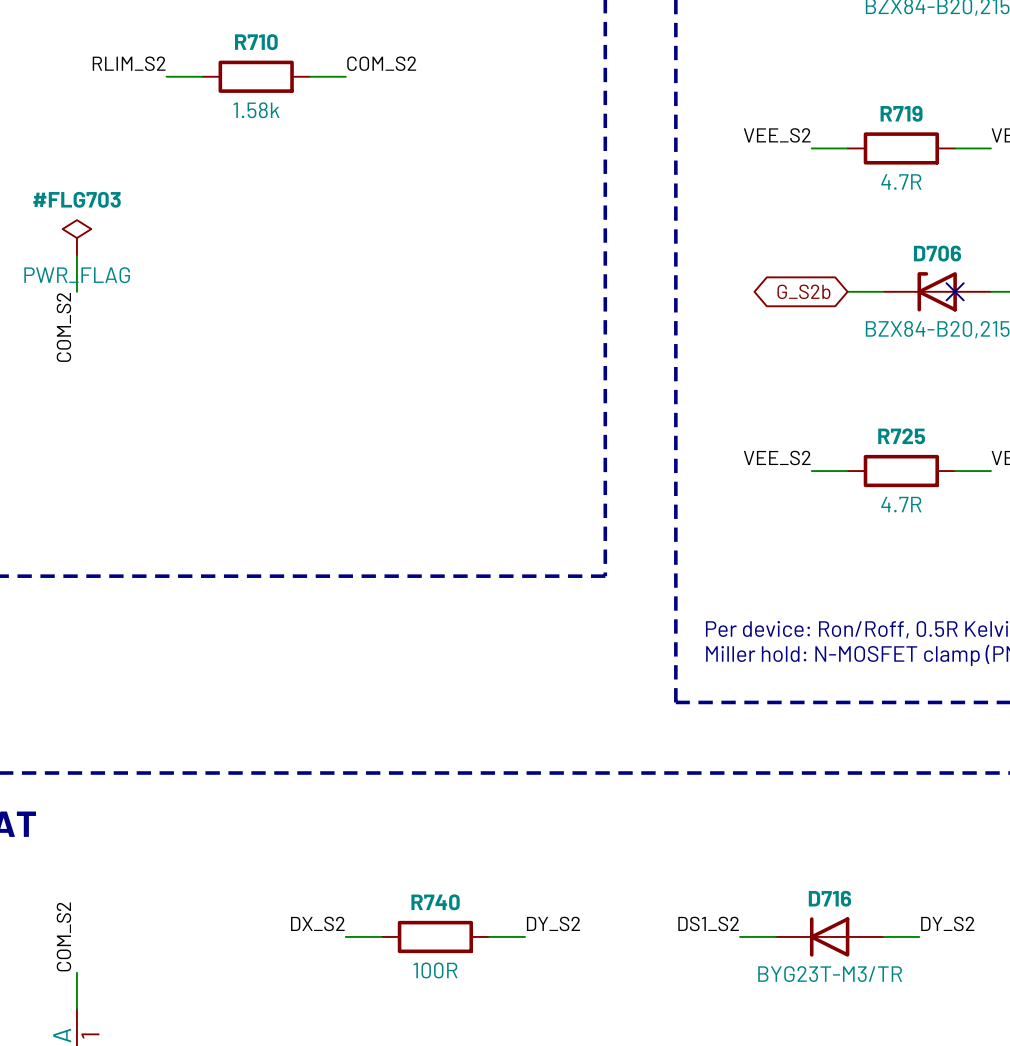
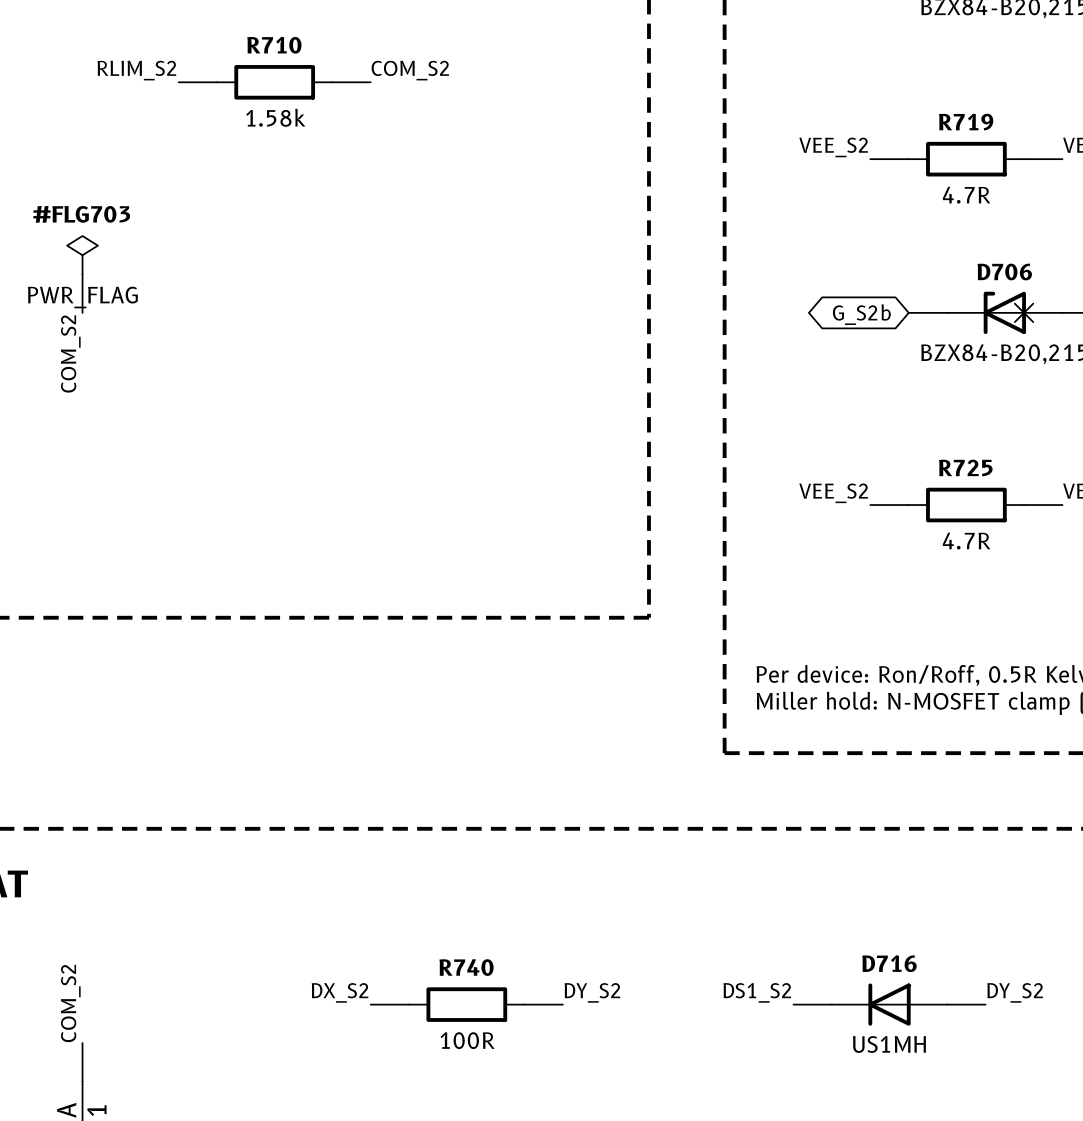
D716 value: BYG23T-M3/TR (830, 974) -> US1MH (889, 1044)

